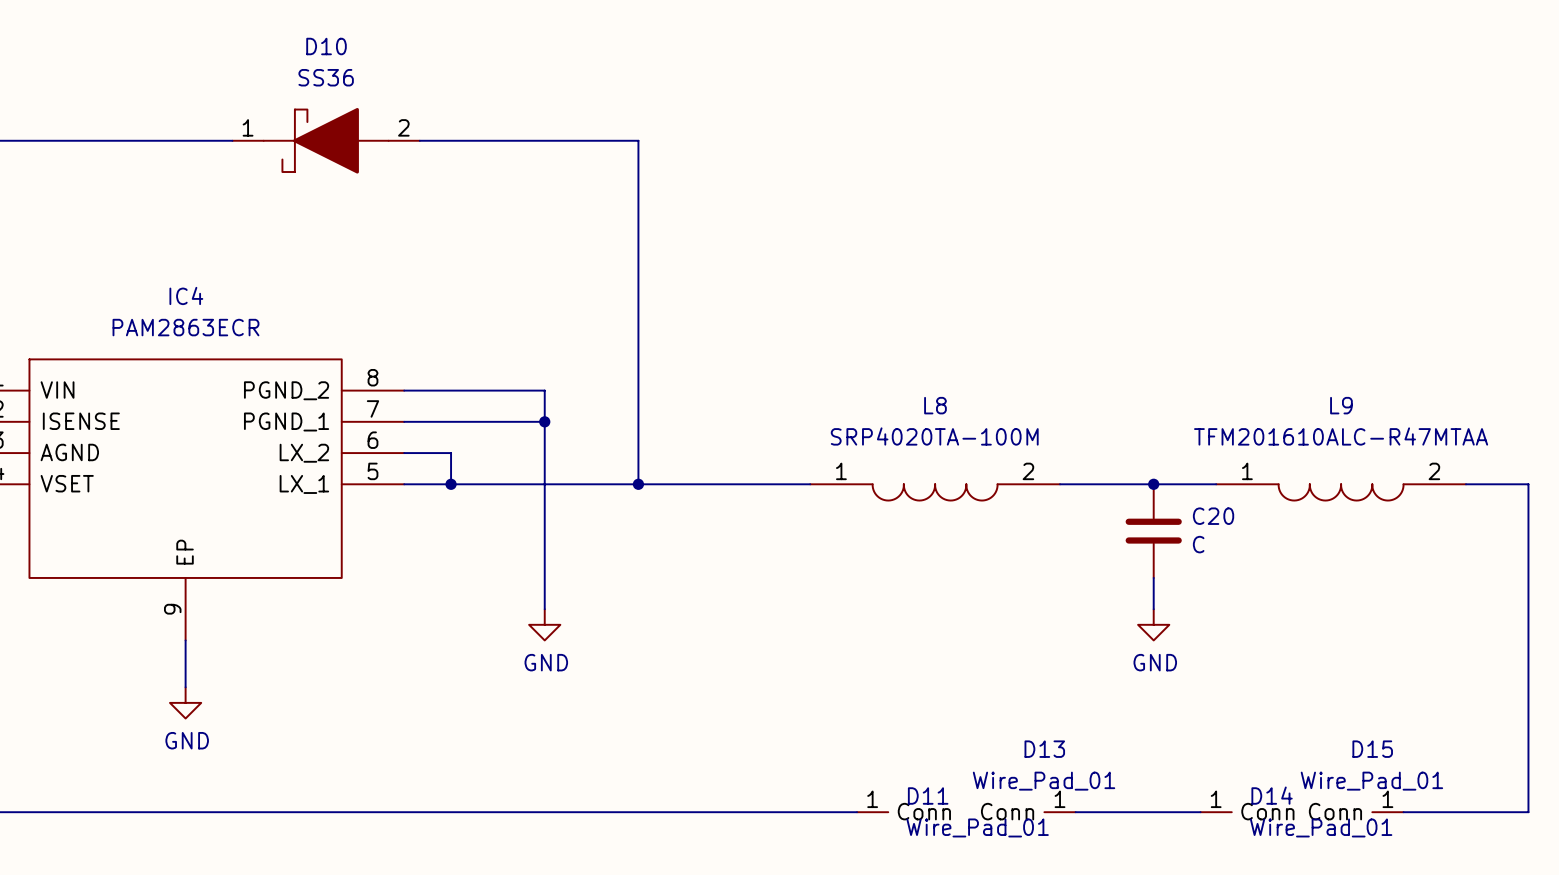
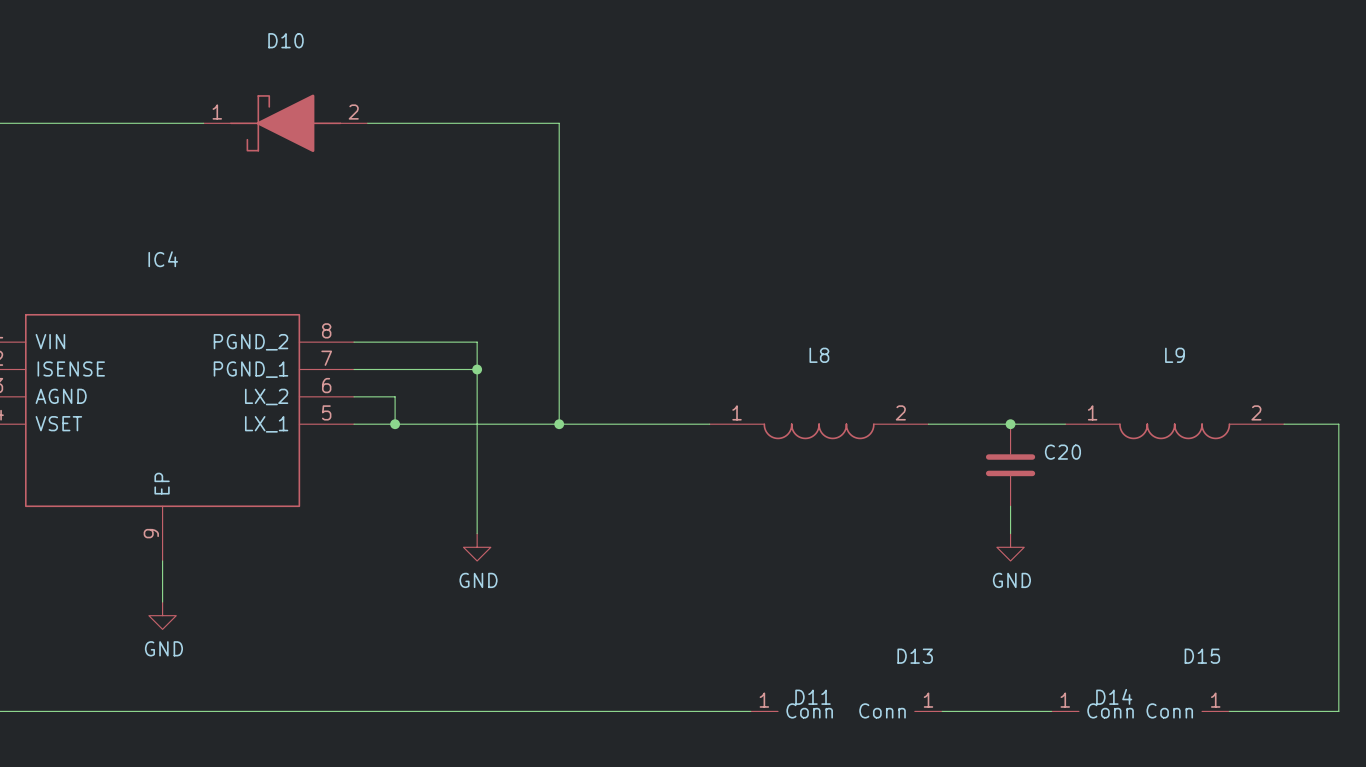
D10 value: SS36 (326, 77) -> none
IC4 value: PAM2863ECR (185, 327) -> none
L8 value: SRP4020TA-100M (934, 436) -> none
L9 value: TFM201610ALC-R47MTAA (1341, 436) -> none
C20 value: C (1198, 544) -> none
D13 value: Wire_Pad_01 (1044, 781) -> none
D15 value: Wire_Pad_01 (1371, 781) -> none
D11 value: Wire_Pad_01 (977, 827) -> none
D14 value: Wire_Pad_01 (1321, 827) -> none

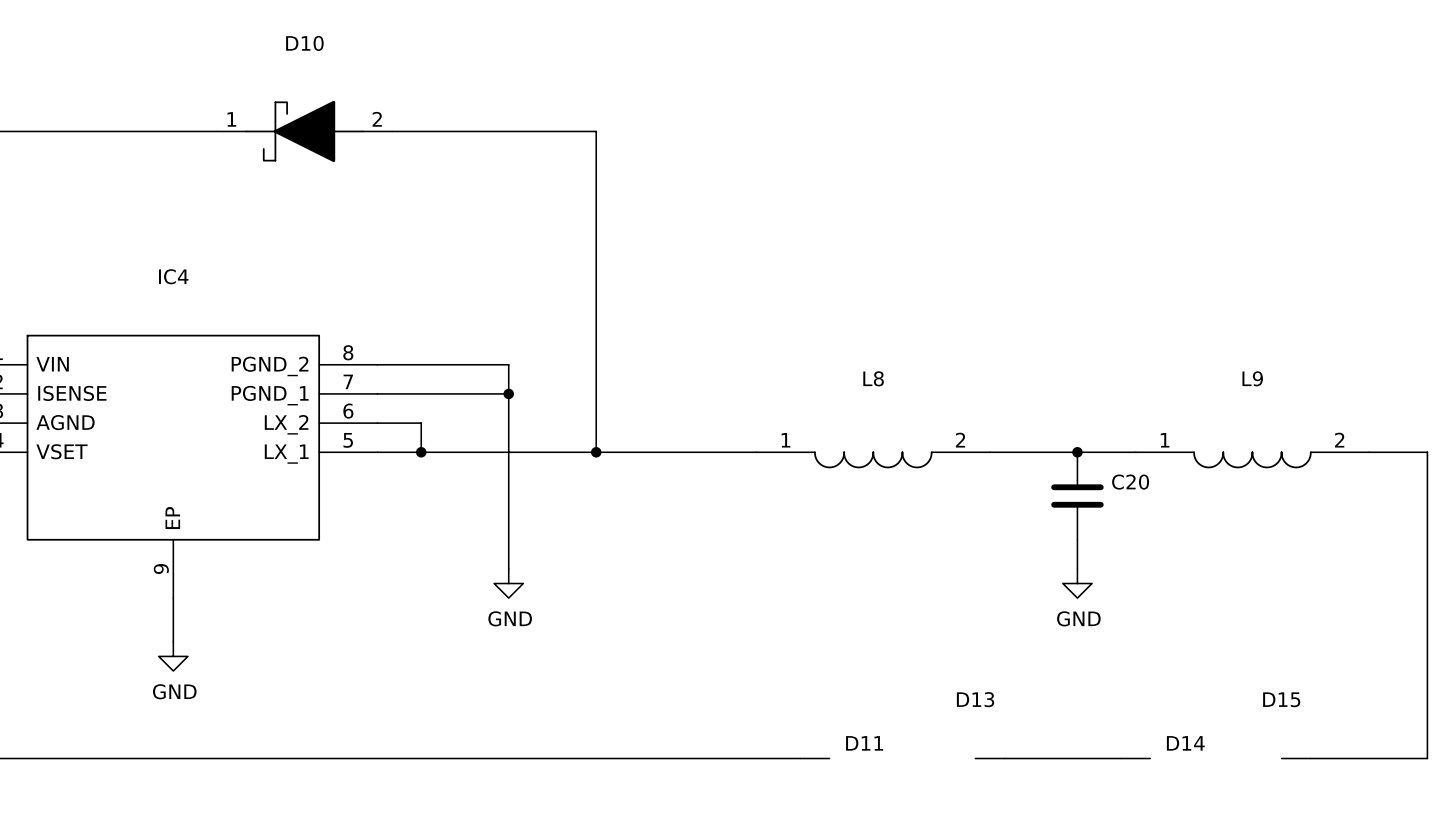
D11 pin number: 1 (764, 700) -> none
D13 pin number: 1 (928, 700) -> none
D14 pin number: 1 (1065, 700) -> none
D15 pin number: 1 (1215, 700) -> none
D11 pin name: Conn (809, 710) -> none
D13 pin name: Conn (882, 710) -> none
D14 pin name: Conn (1110, 710) -> none
D15 pin name: Conn (1169, 710) -> none

